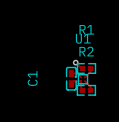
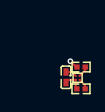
R1 name: R1 (86, 29) -> none
U1 name: U1 (83, 38) -> none
R2 name: R2 (86, 51) -> none
C1 name: C1 (32, 78) -> none

